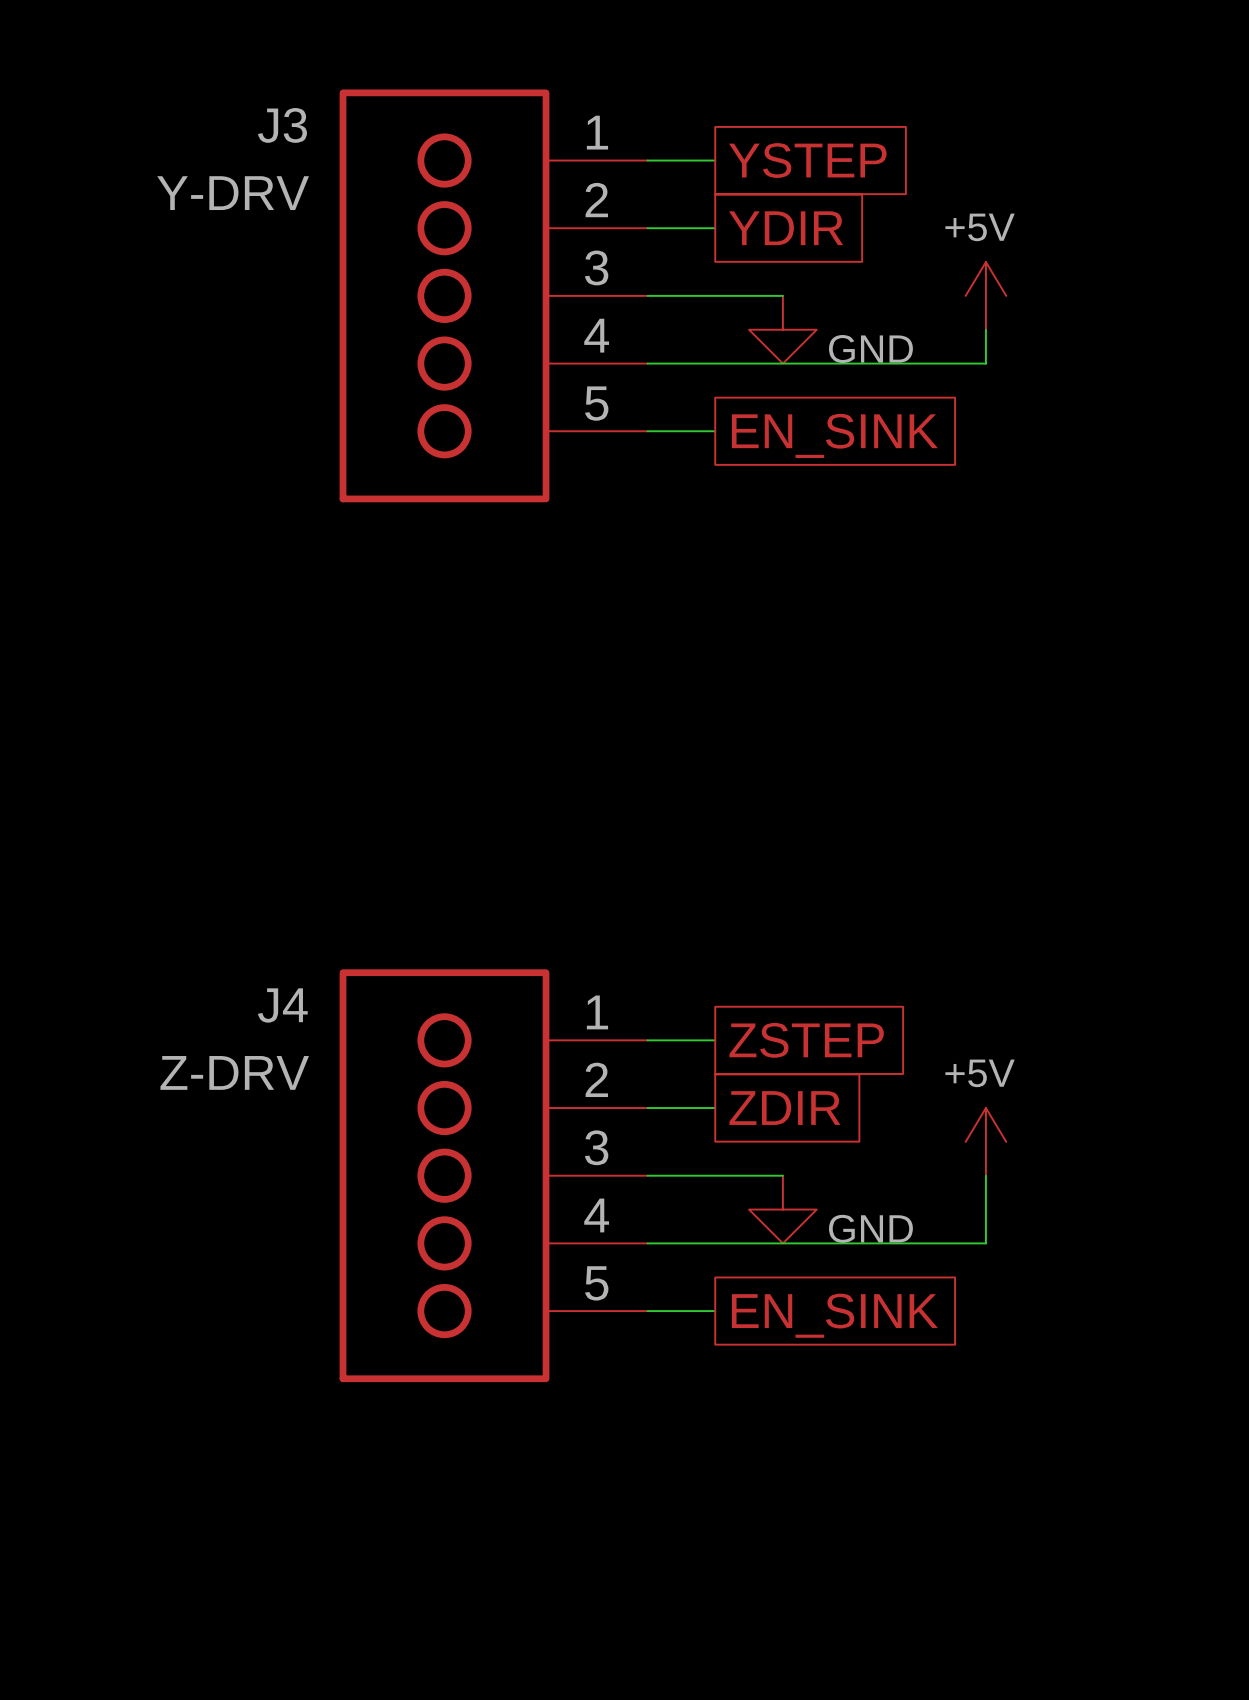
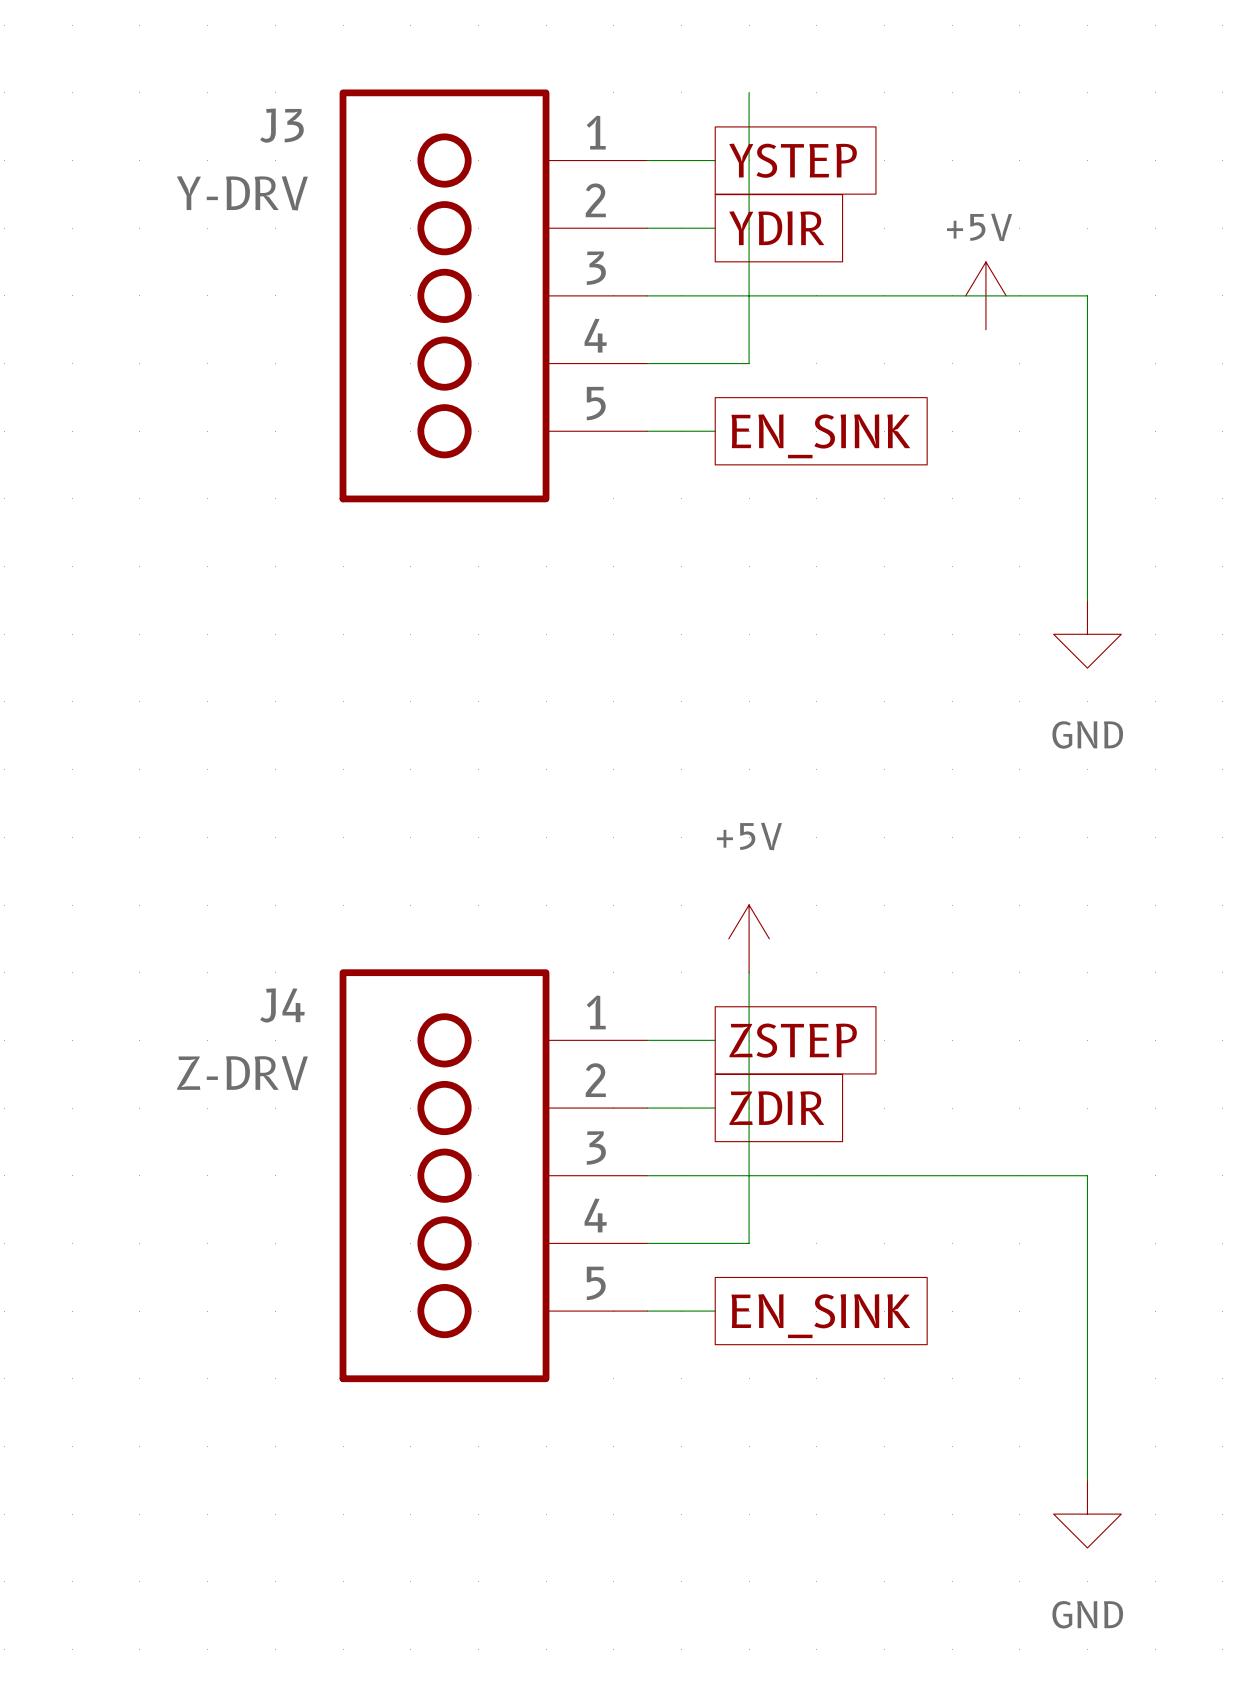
wire: none -> (782, 295) (1087, 295) (1087, 600)
power symbol: GND (782, 329) -> none
wire: (985, 329) (985, 363) (749, 363) -> (749, 92) (749, 363)
power symbol: none -> GND (1087, 634)
power symbol text position: +5V (980, 1073) -> +5V (749, 836)
power symbol position: +5V (985, 1141) -> +5V (749, 938)
wire: none -> (782, 1175) (1087, 1175) (1087, 1480)
wire: (985, 1175) (985, 1243) (749, 1243) -> (749, 972) (749, 1243)
power symbol: GND (782, 1209) -> none
power symbol: none -> GND (1087, 1514)

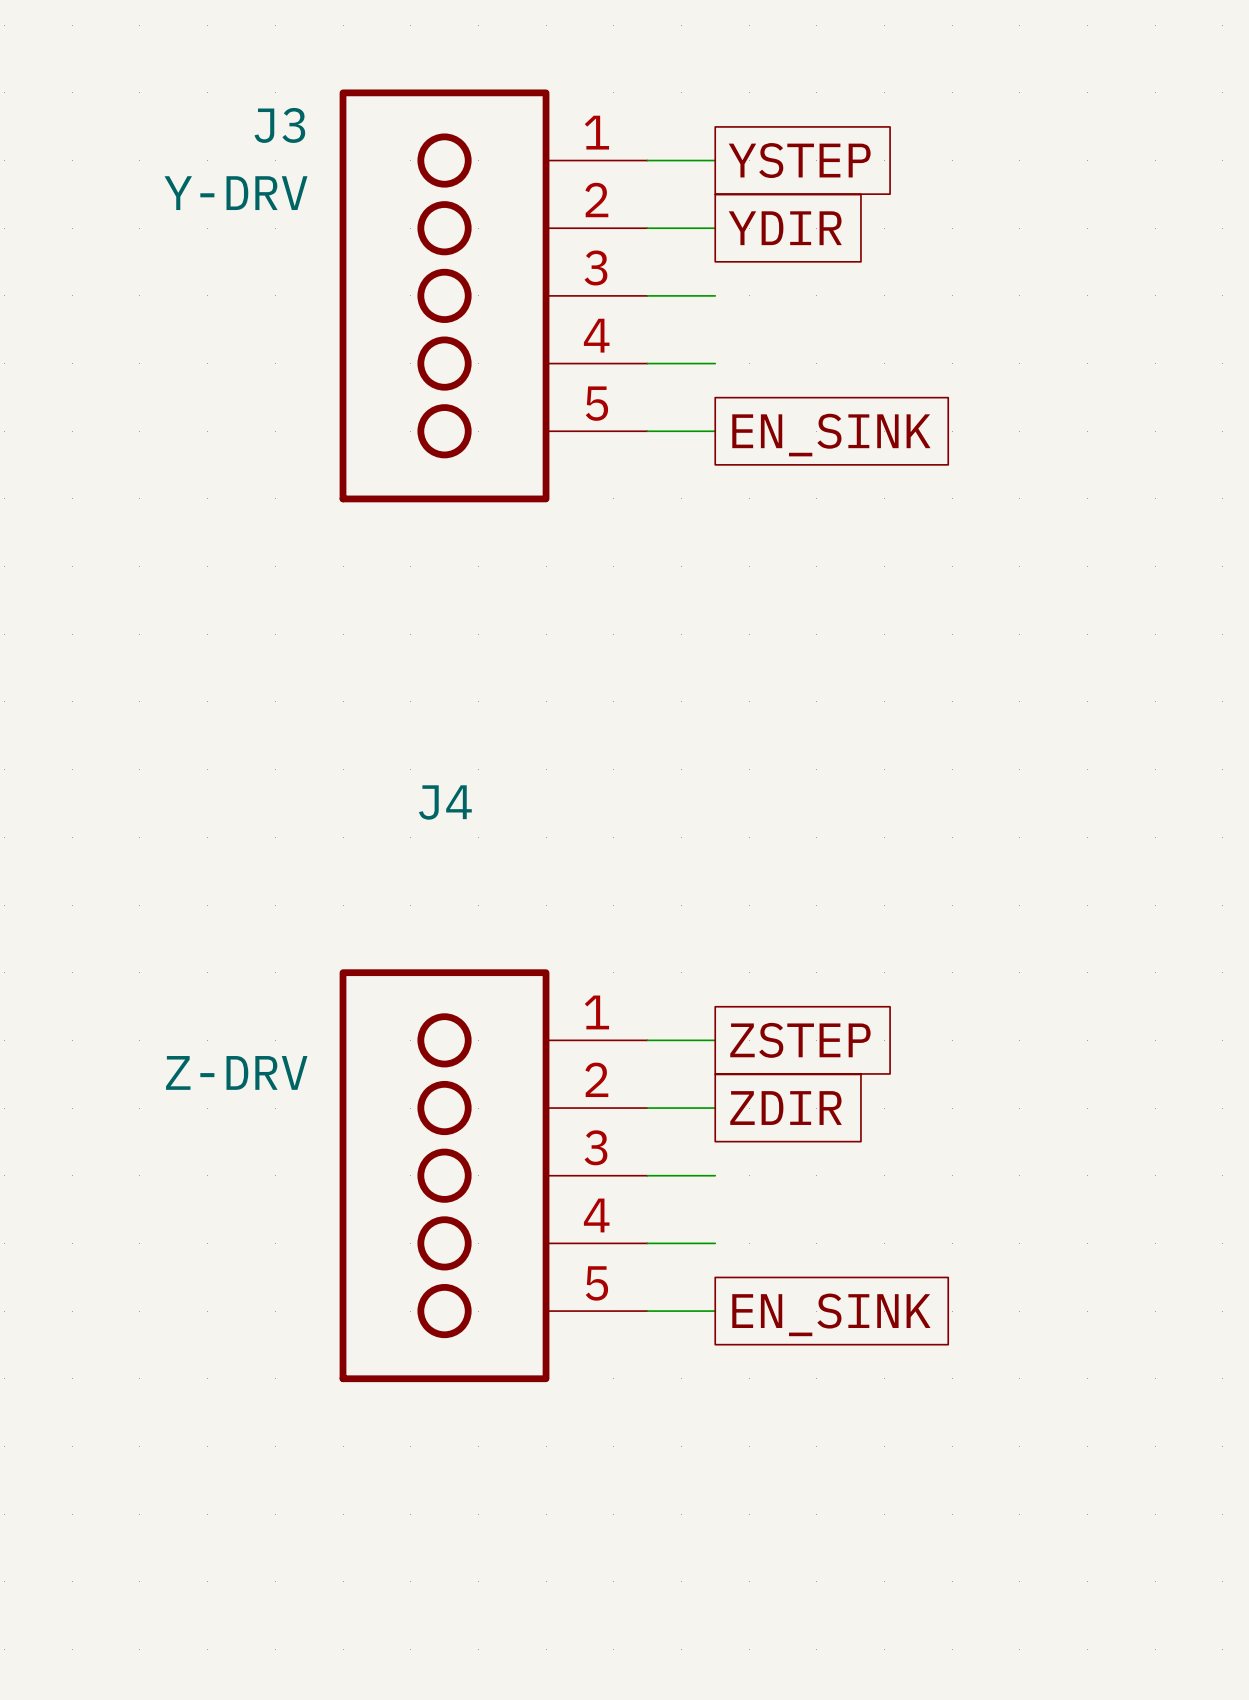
wire: (749, 92) (749, 363) (715, 363) -> none
wire: (715, 295) (1087, 295) (1087, 600) -> none
power symbol: +5V (985, 295) -> none
power symbol: GND (1087, 634) -> none
power symbol: +5V (749, 938) -> none
wire: (749, 972) (749, 1243) (715, 1243) -> none
J4 name position: J4 (282, 1005) -> J4 (445, 802)
wire: (715, 1175) (1087, 1175) (1087, 1480) -> none
power symbol: GND (1087, 1514) -> none

